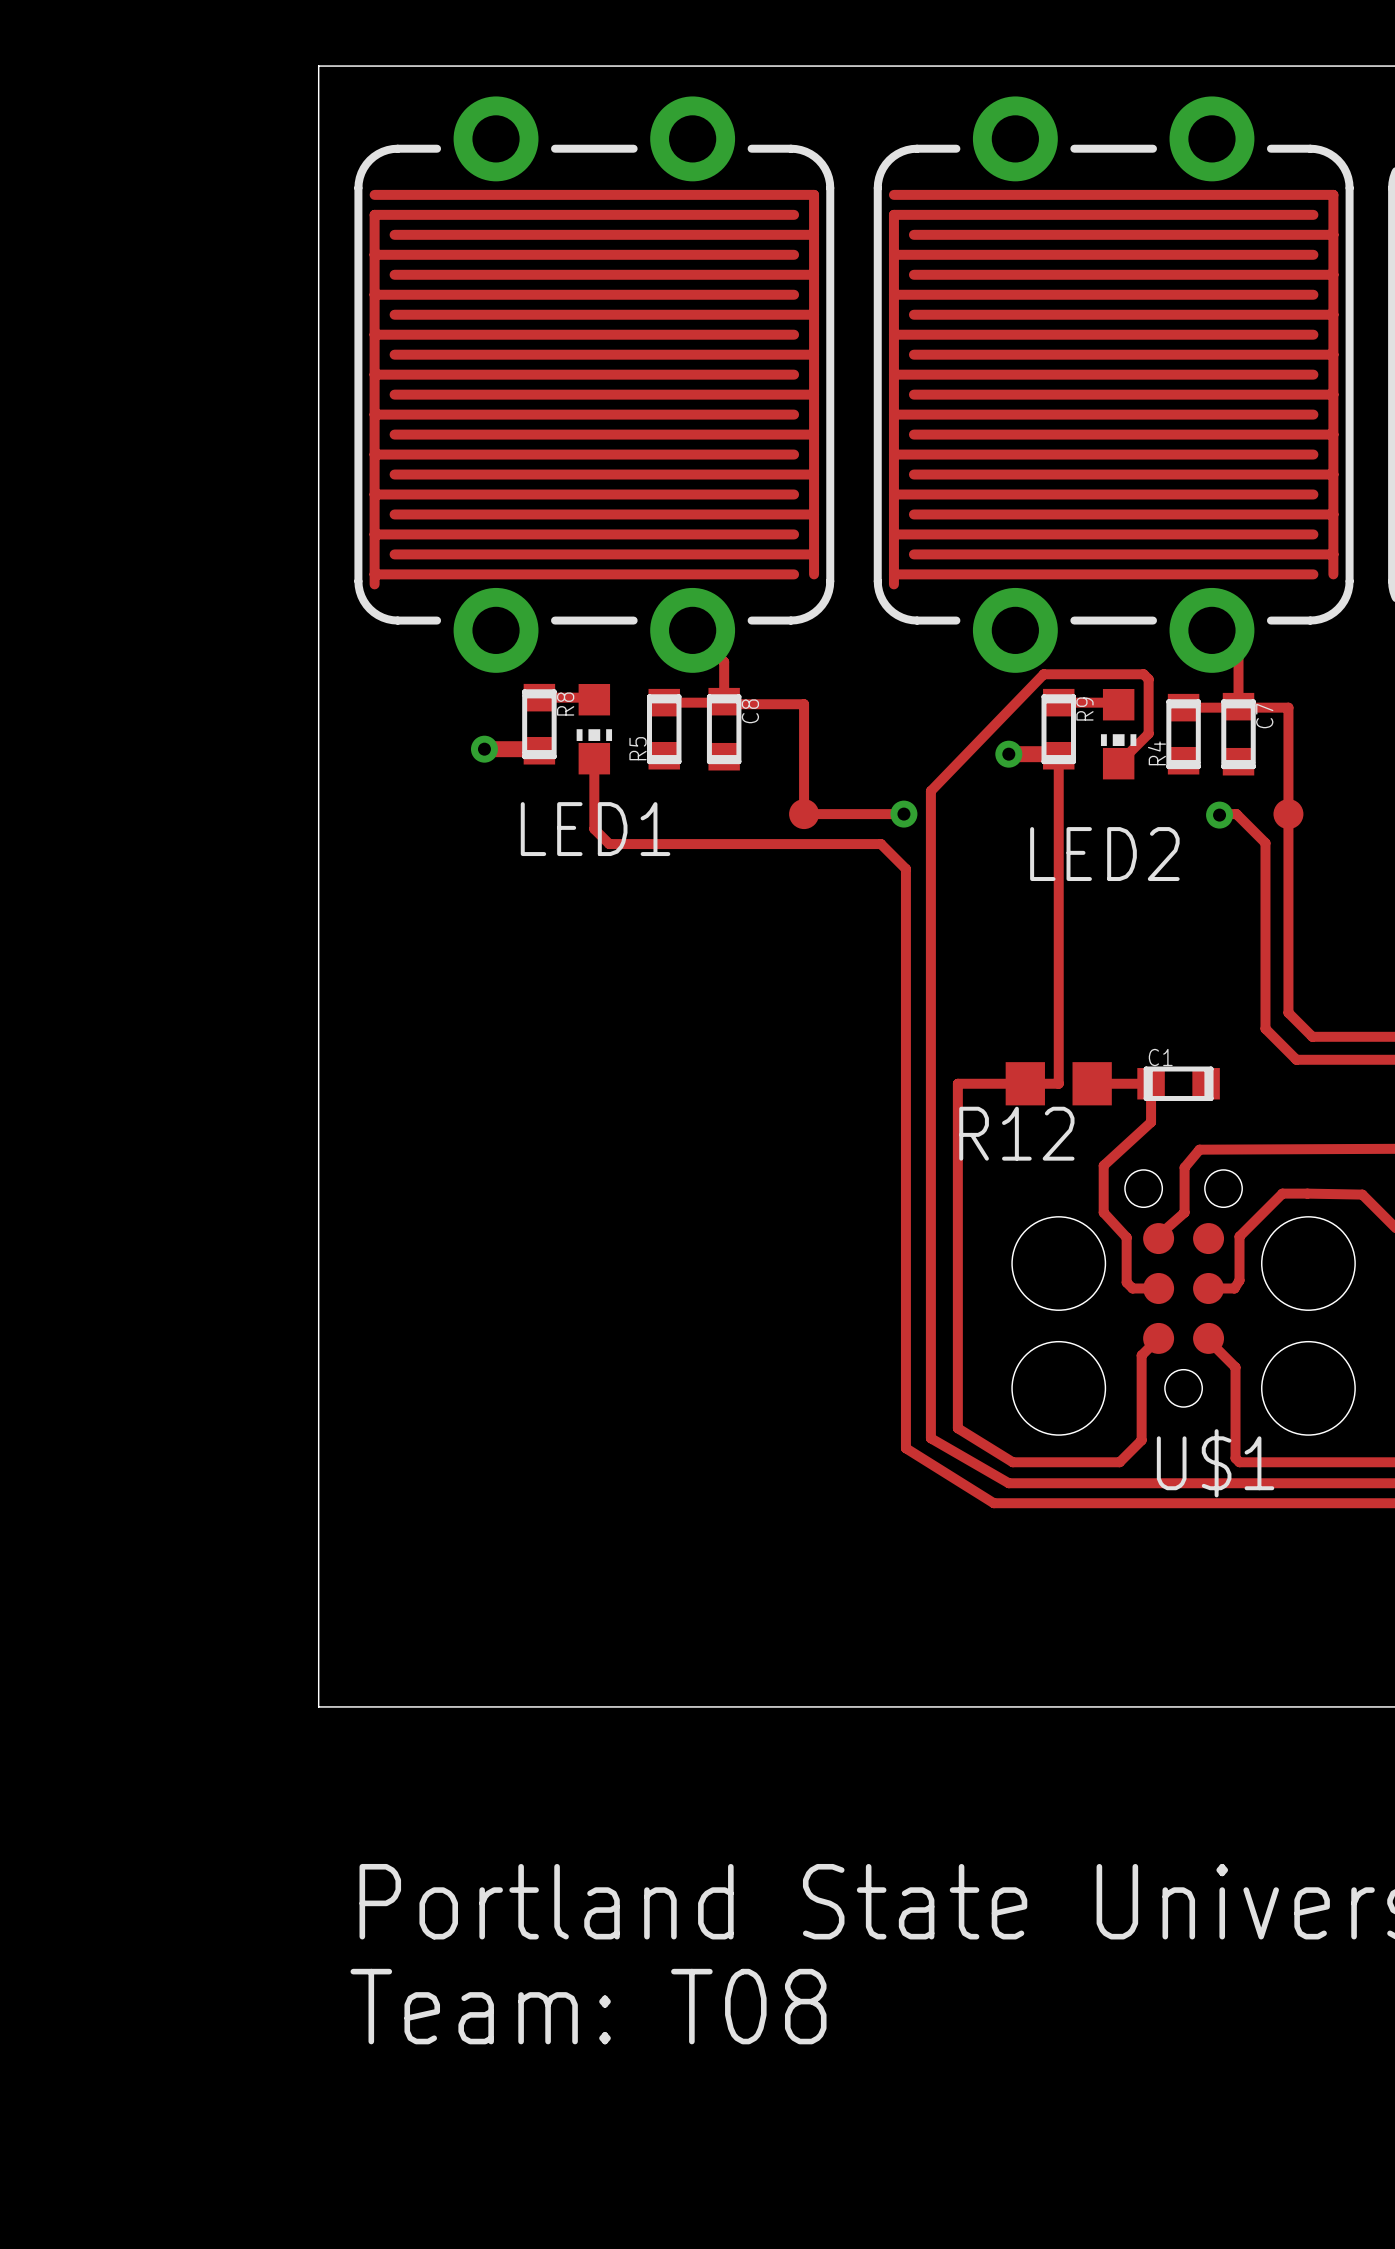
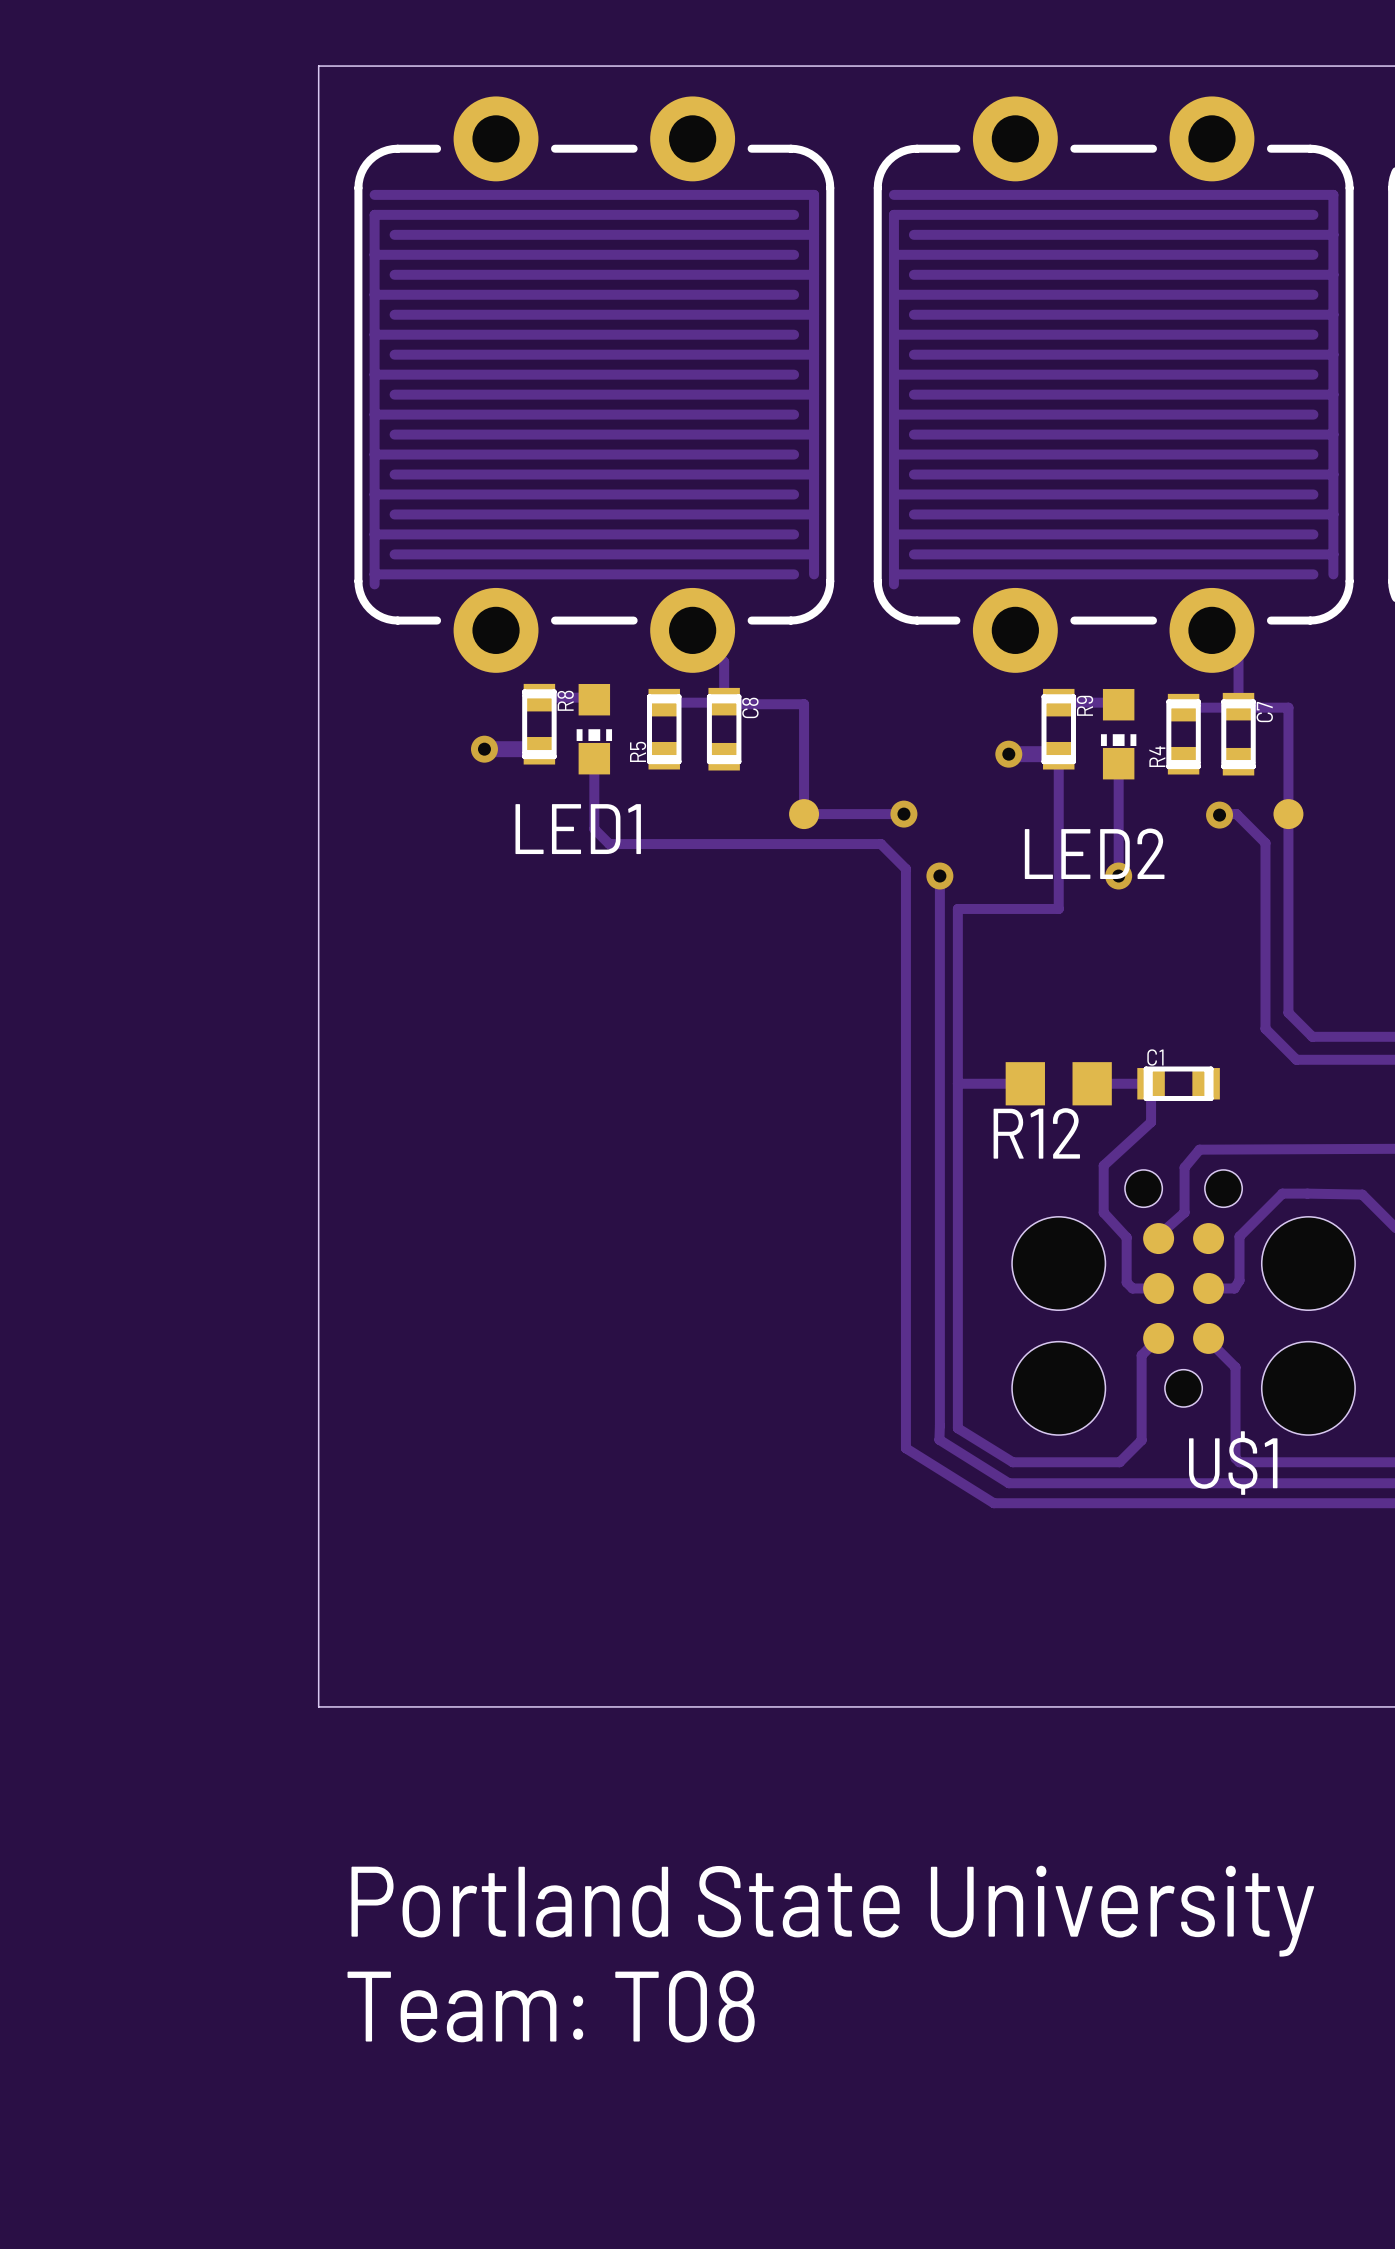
track: (1118, 763) (1148, 733) (1148, 679) (1143, 674) (1043, 674) (930, 791) (930, 1438) (1008, 1483) -> (939, 876) (939, 1439) (1008, 1483)
track: none -> (1118, 763) (1118, 876)
via: none -> (939, 876)
via: none -> (1118, 876)
track: (1058, 908) (1058, 1083) (1025, 1083) -> (1058, 908) (957, 908) (957, 1083)

